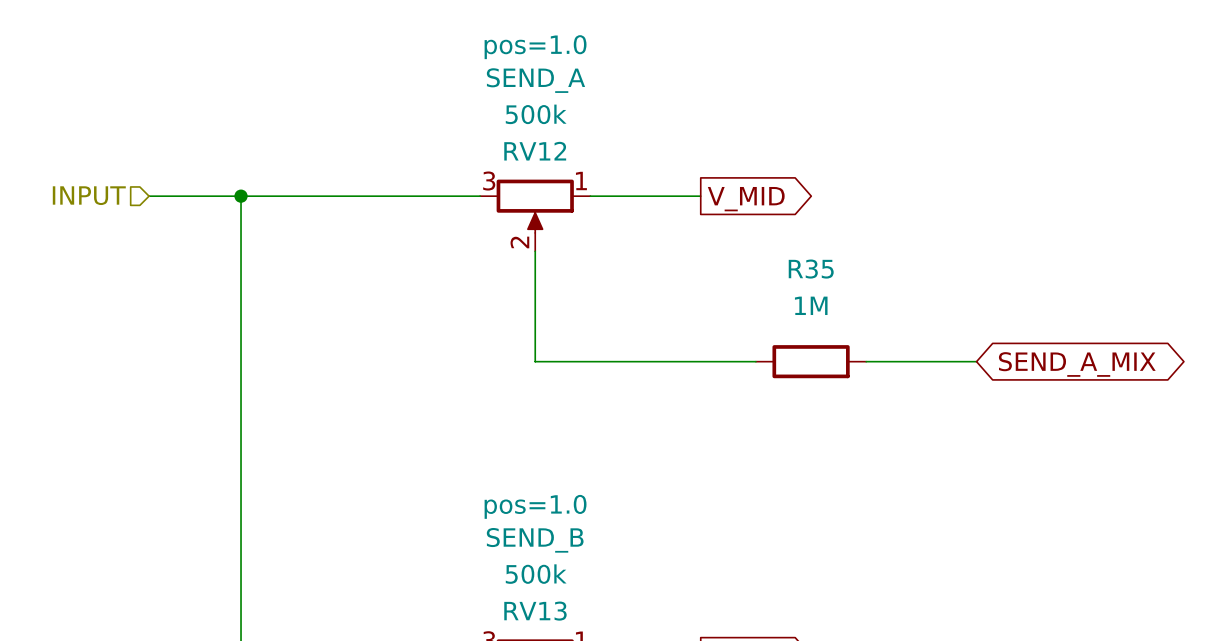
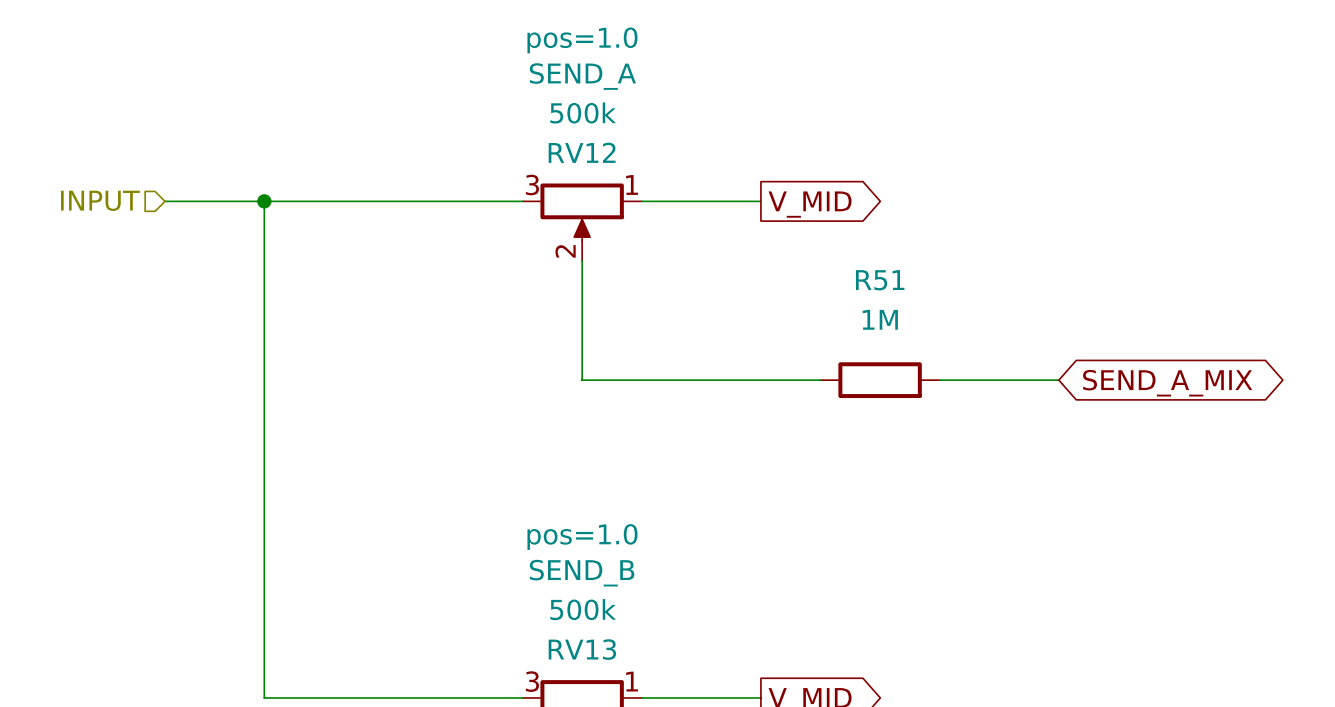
R35 name: R35 (811, 269) -> R51 (880, 280)

